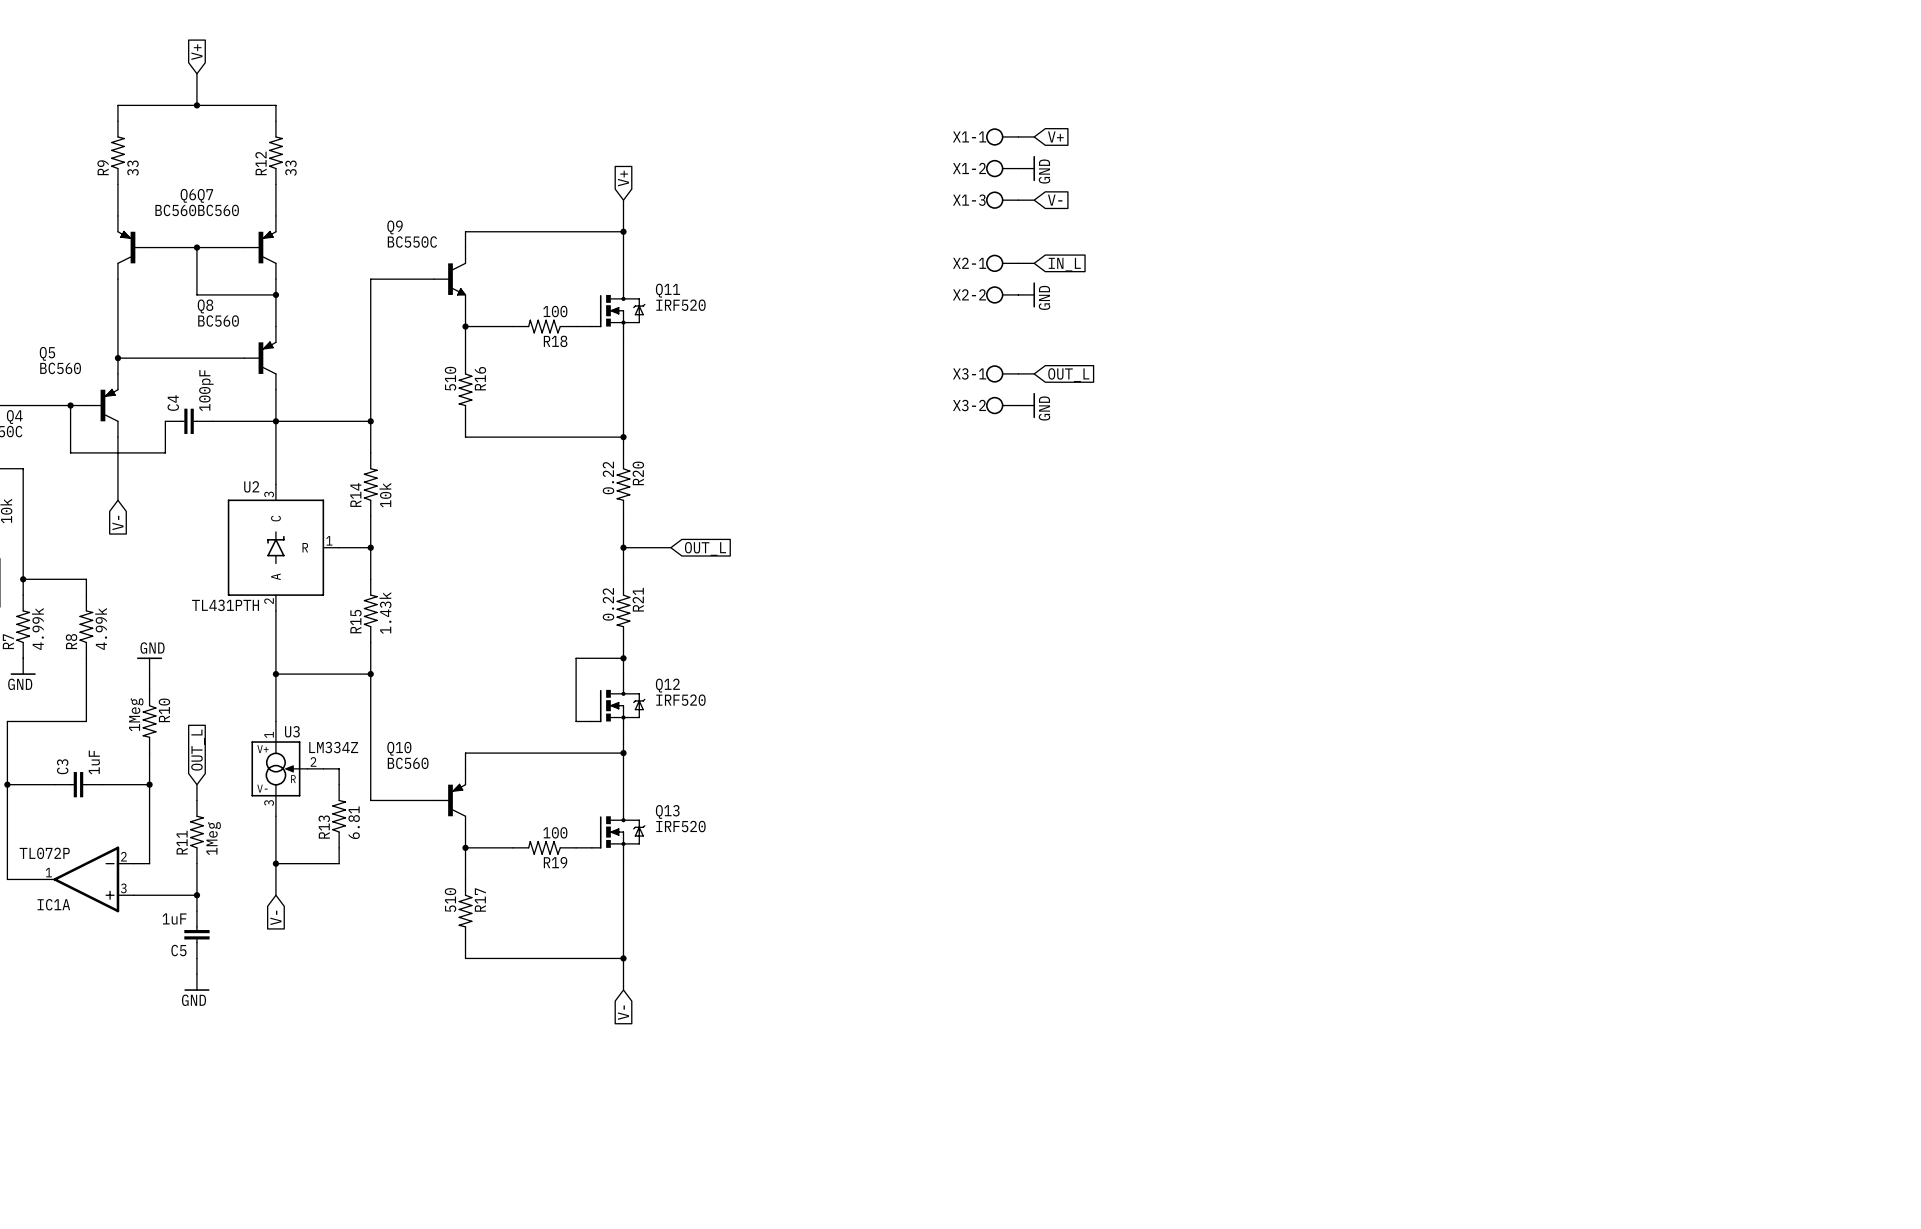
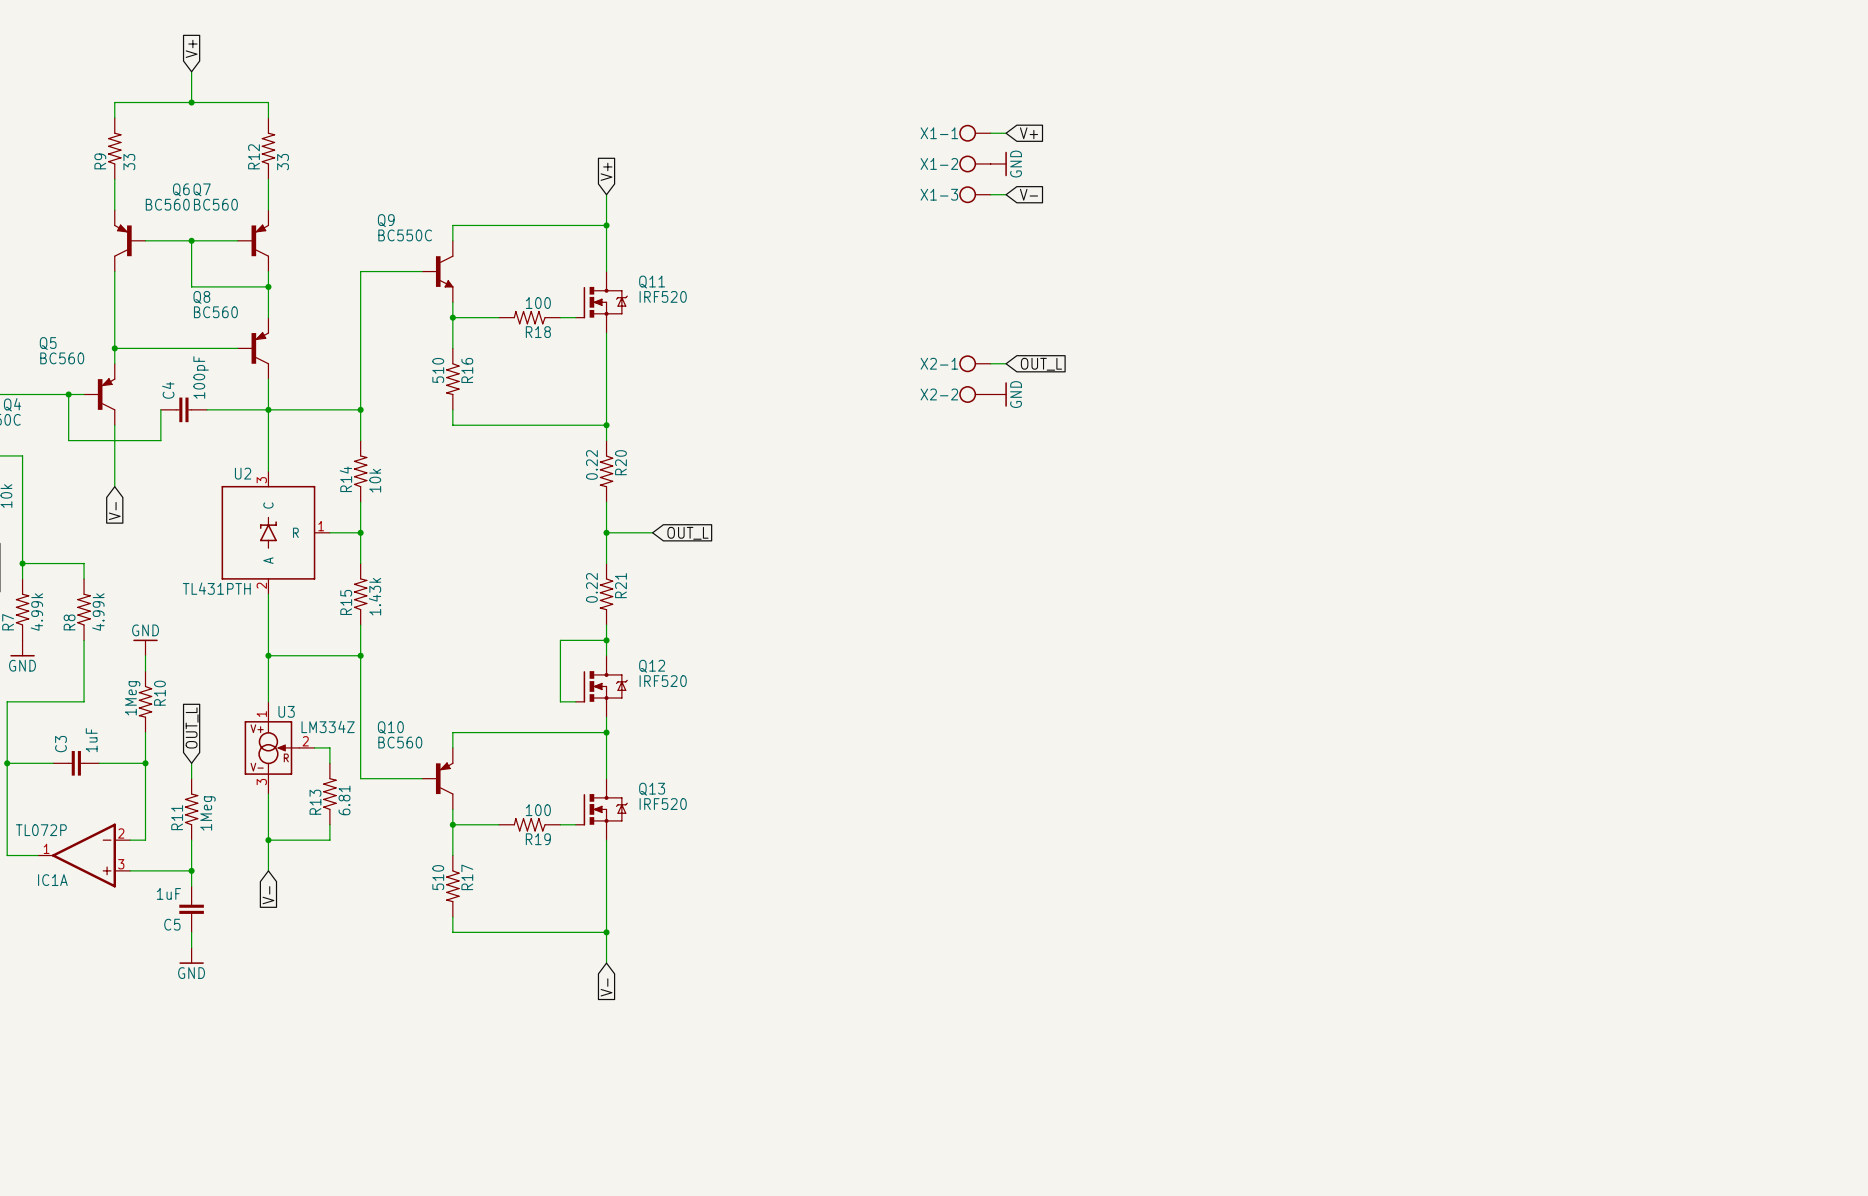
X2-1: (1002, 263) -> none
wire: (1018, 263) (1034, 263) -> none
global label: IN_L (1064, 264) -> none
X2-2: (1002, 294) -> none
power symbol: GND (1026, 294) -> none
X3-1 name: X3-1 (969, 373) -> X2-1 (939, 363)
X3-2 name: X3-2 (969, 405) -> X2-2 (939, 394)

